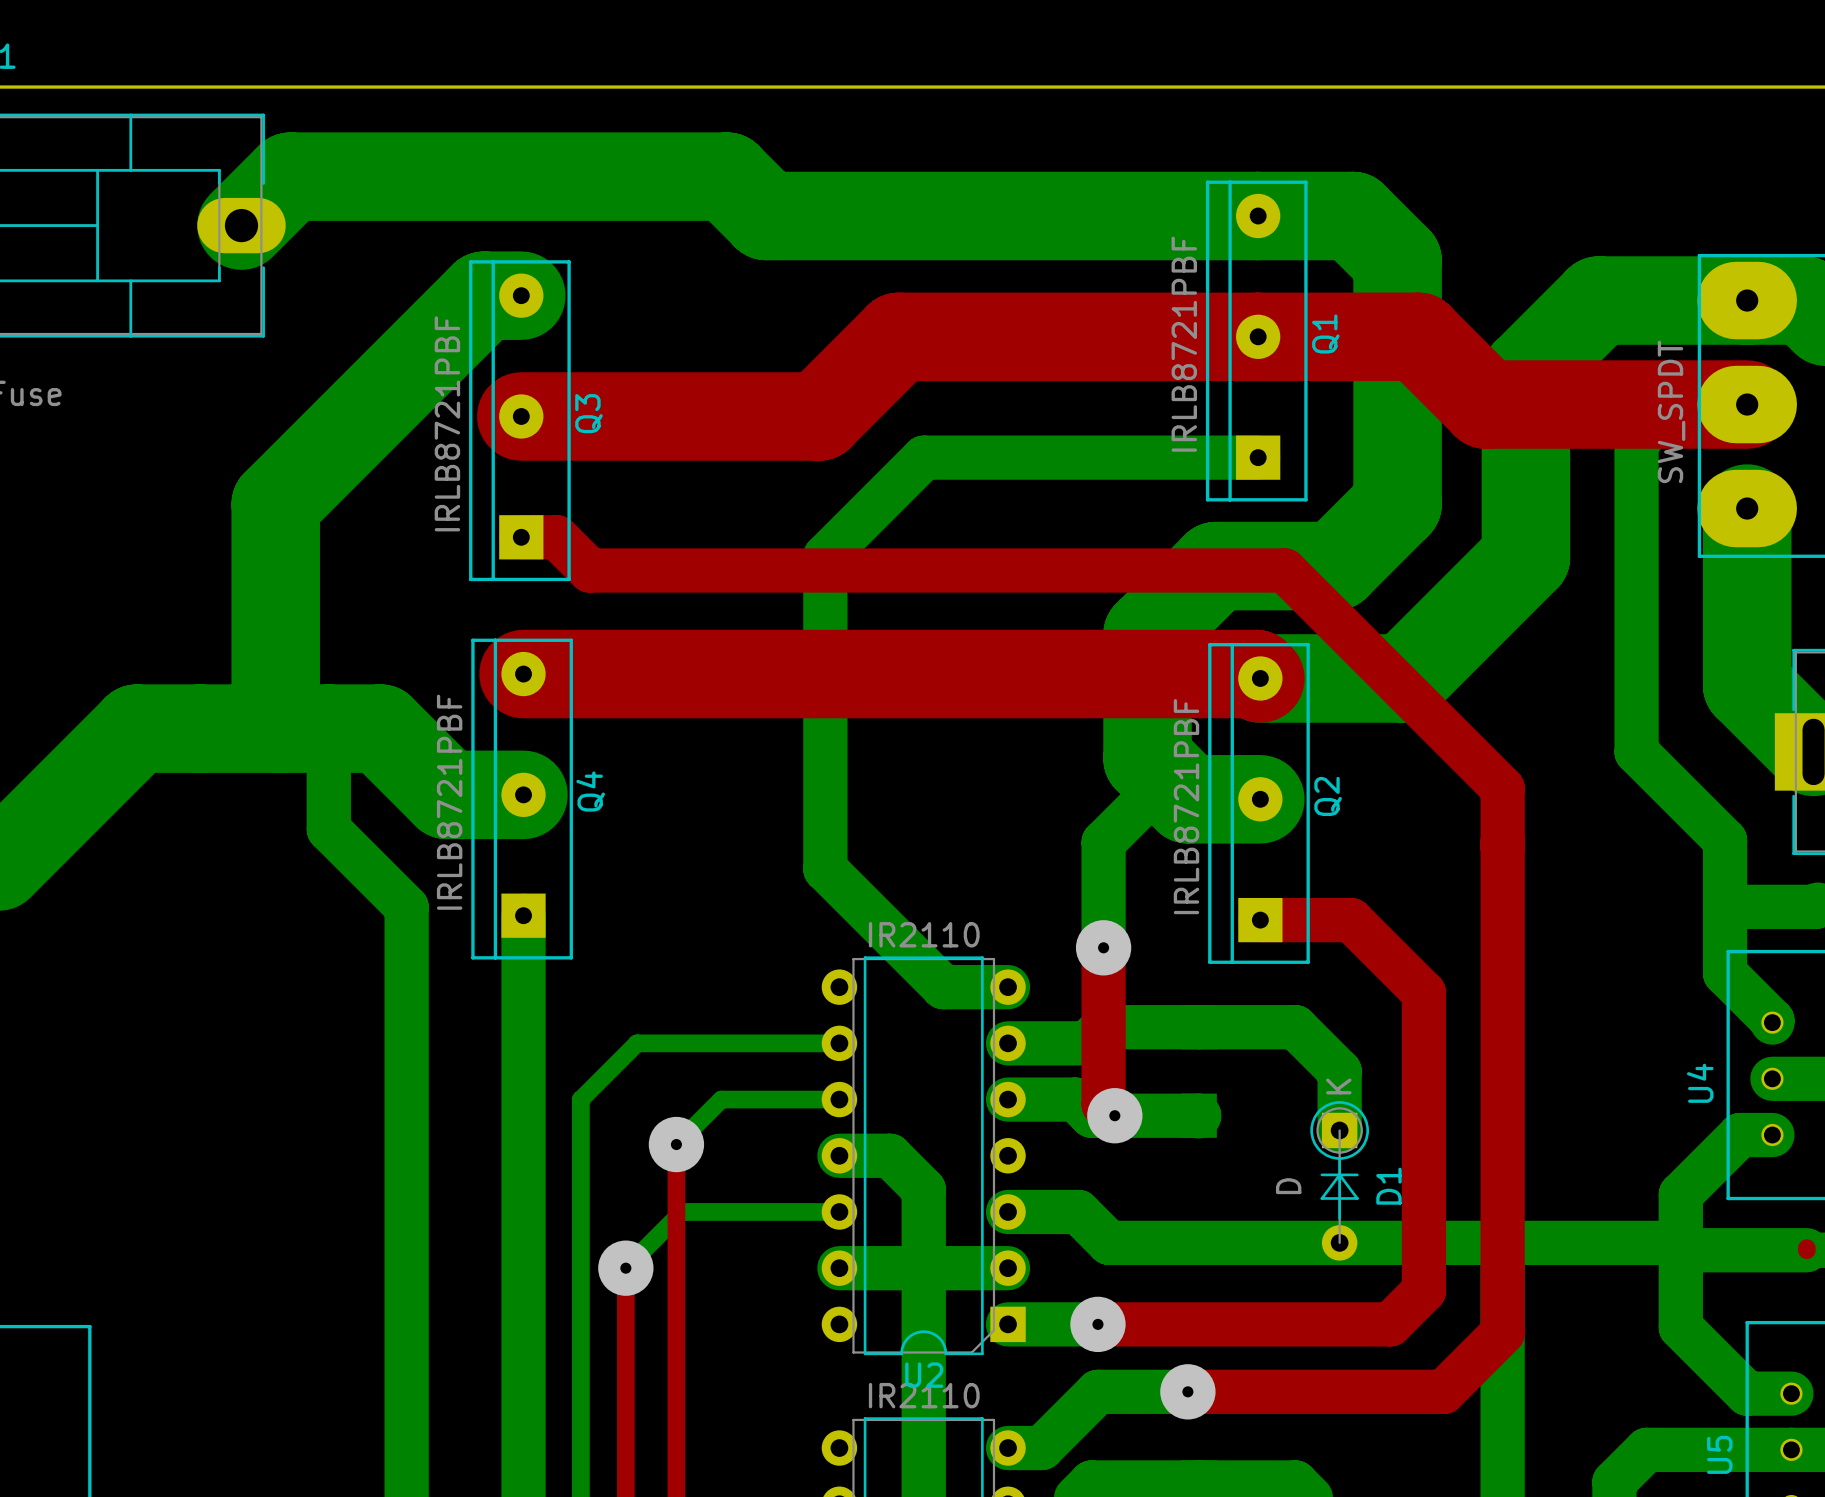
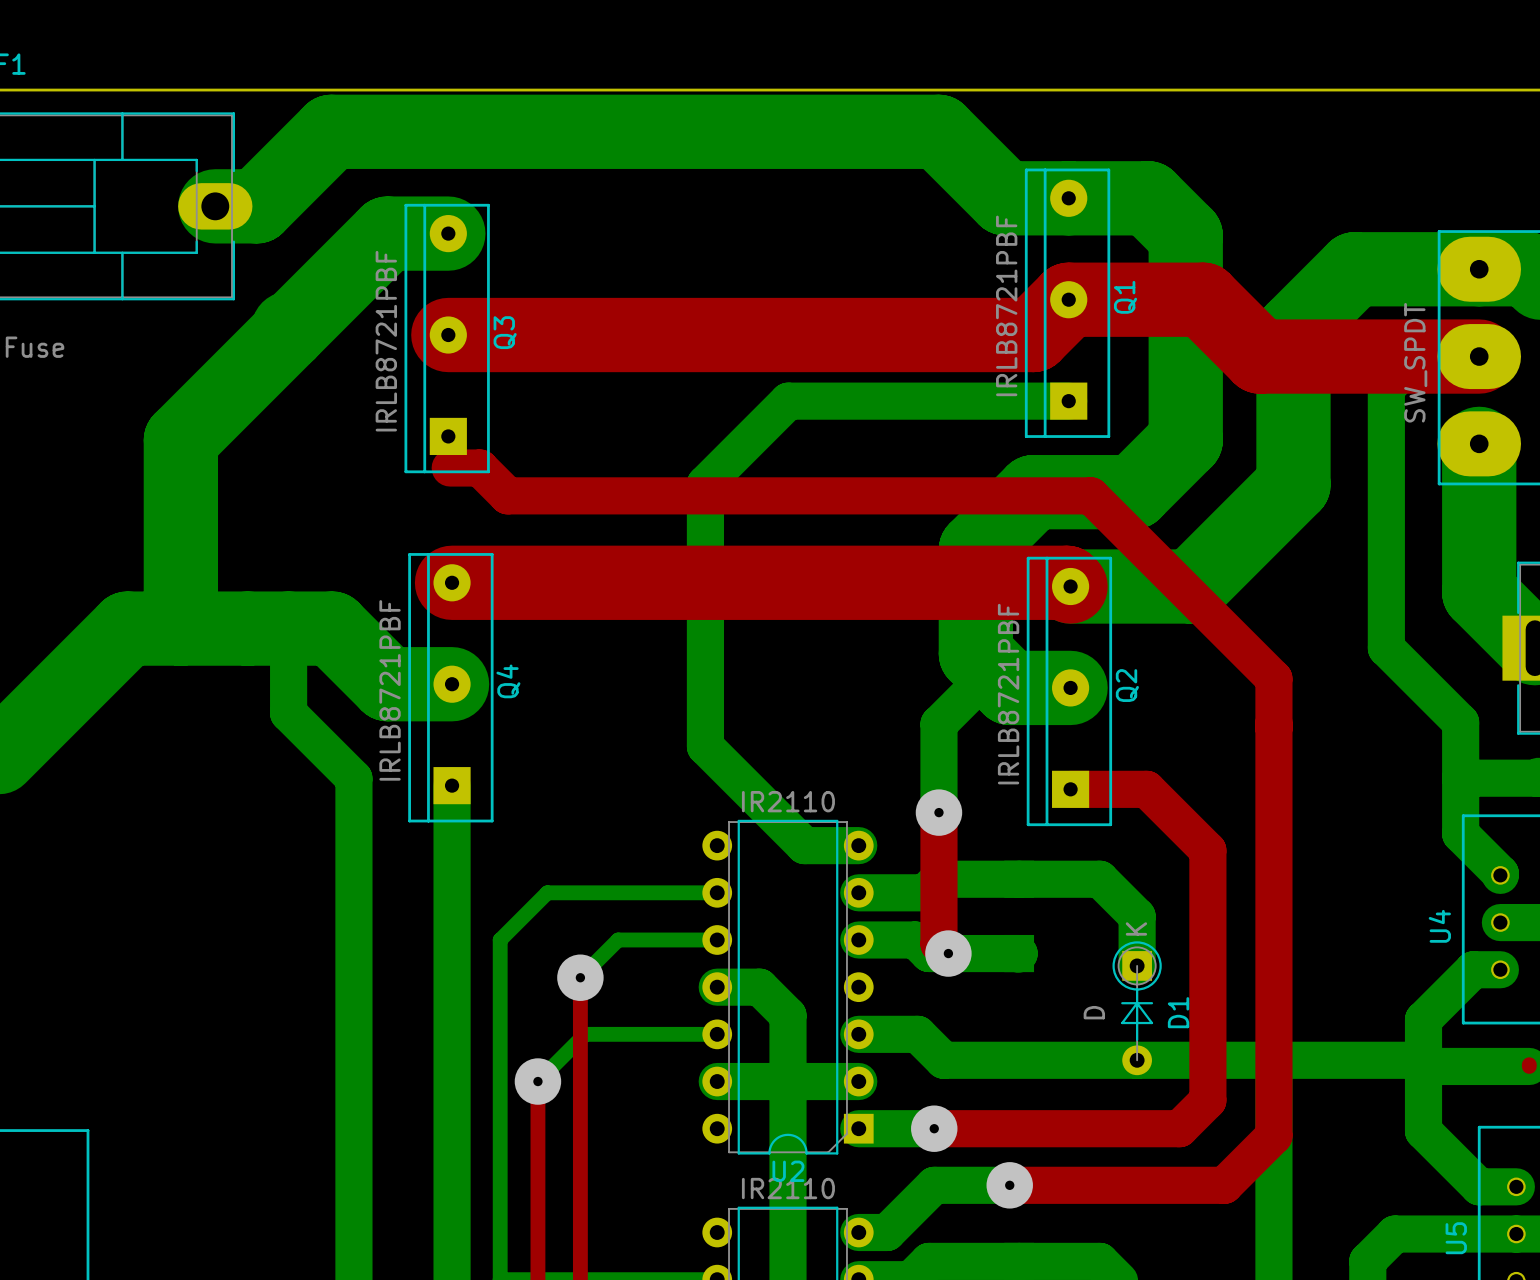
bottom track: (1182, 216) (766, 216) (727, 176) (290, 176) (241, 225) -> (1005, 198) (938, 131) (331, 131) (256, 206) (215, 206)
bottom track: none -> (448, 233) (387, 233) (180, 440) (180, 628)
bottom track: (521, 295) (484, 295) (275, 504) (275, 724) (280, 728) -> none
top track: (1258, 336) (898, 336) (819, 416) (521, 416) -> (1068, 299) (1033, 335) (448, 335)
Q3 position: (519, 420) -> (447, 338)

